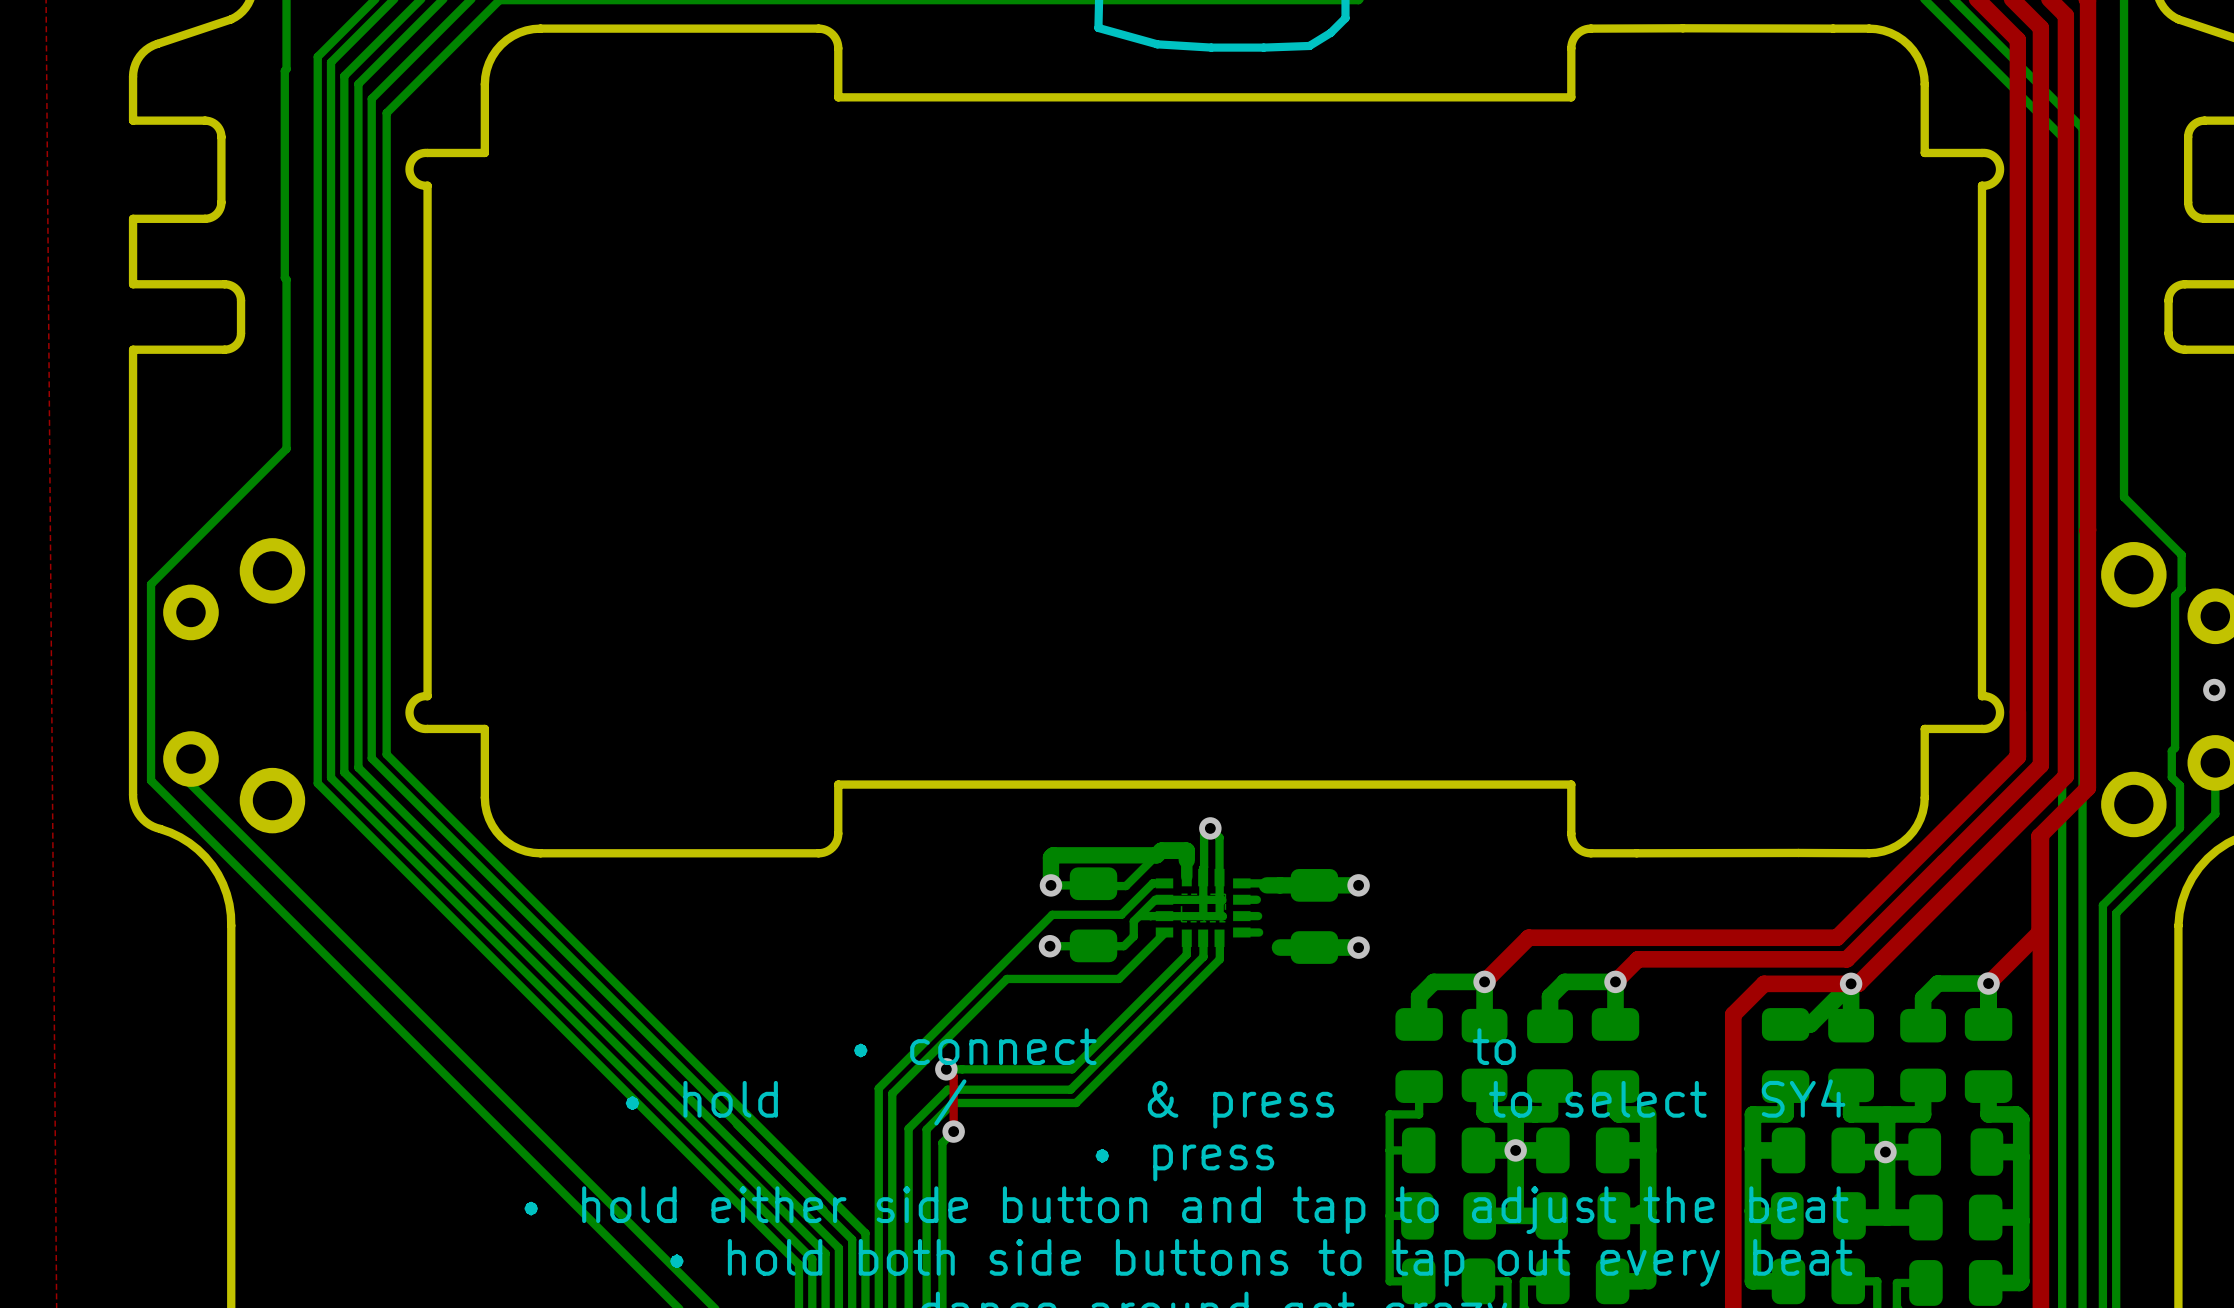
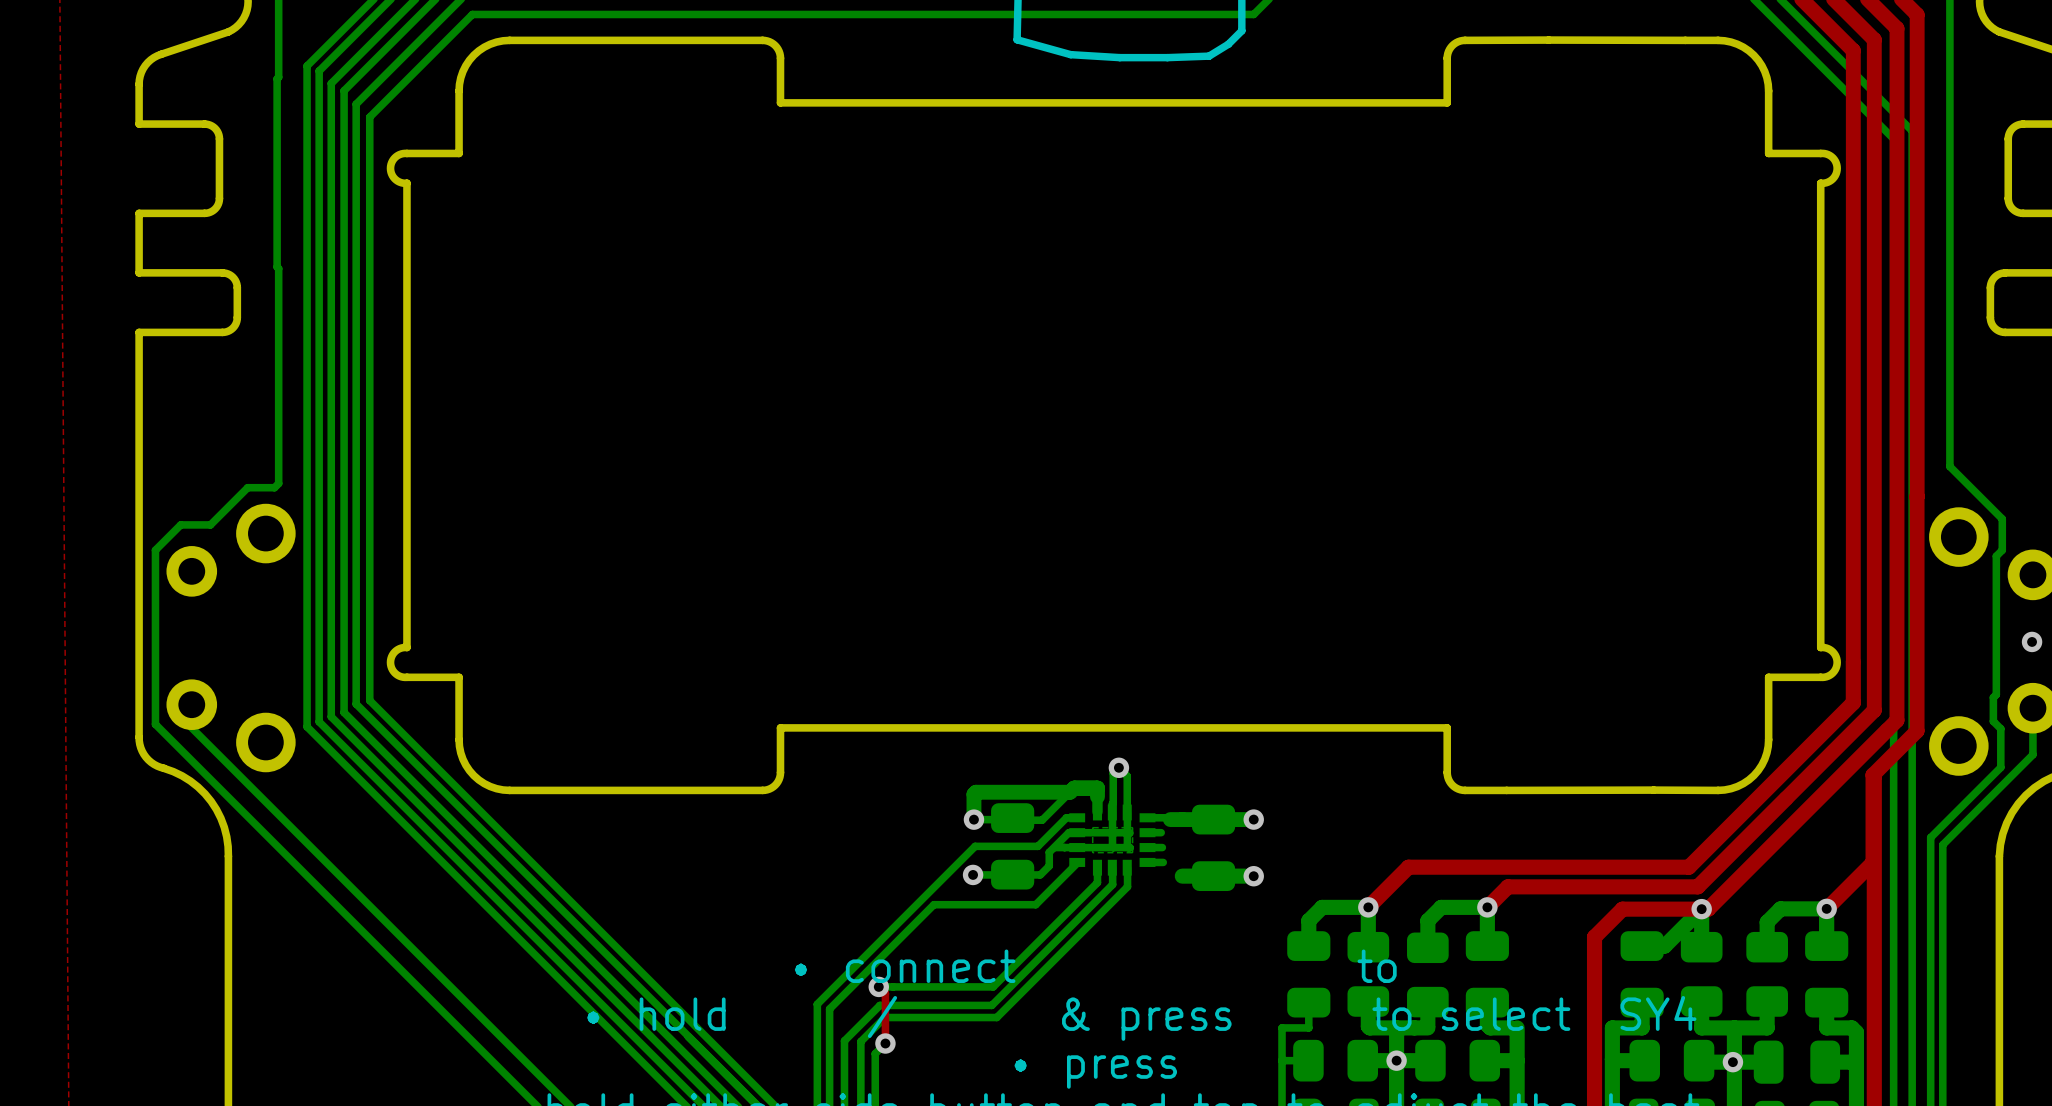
bottom track: (286, 448) (151, 584) (151, 589) -> (278, 422) (278, 483) (274, 487) (247, 487) (210, 524) (180, 524) (155, 550)

